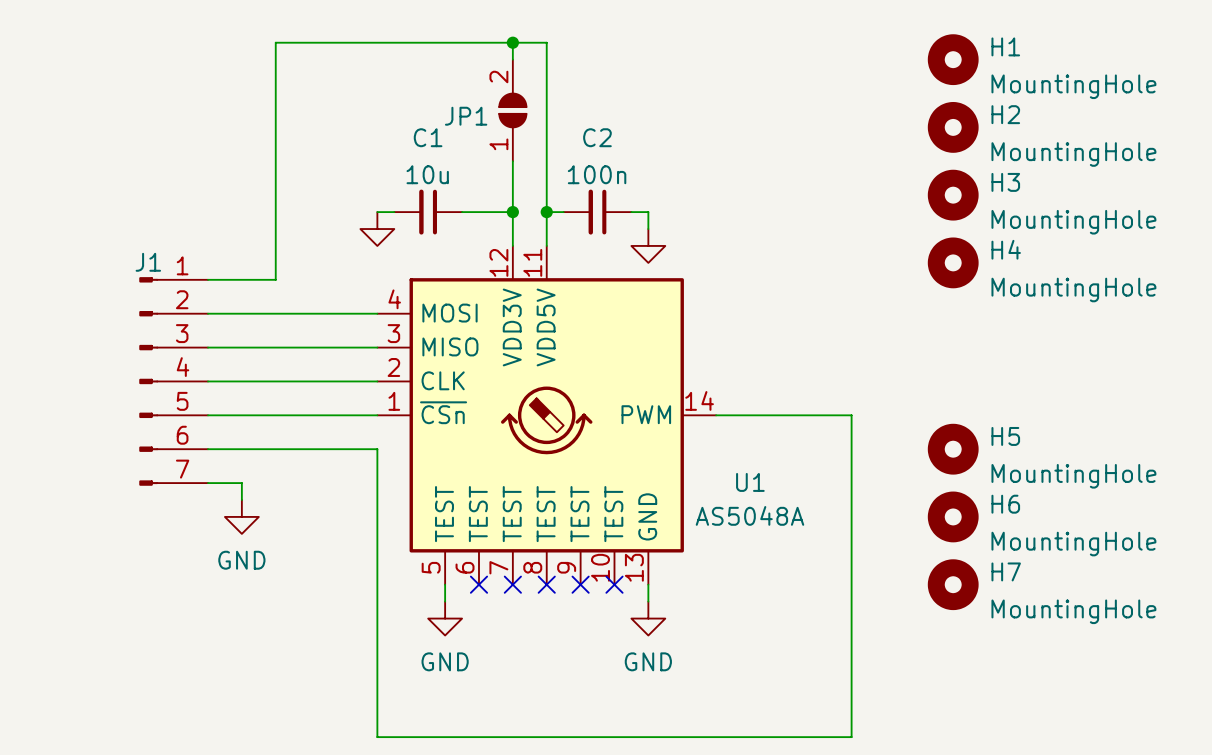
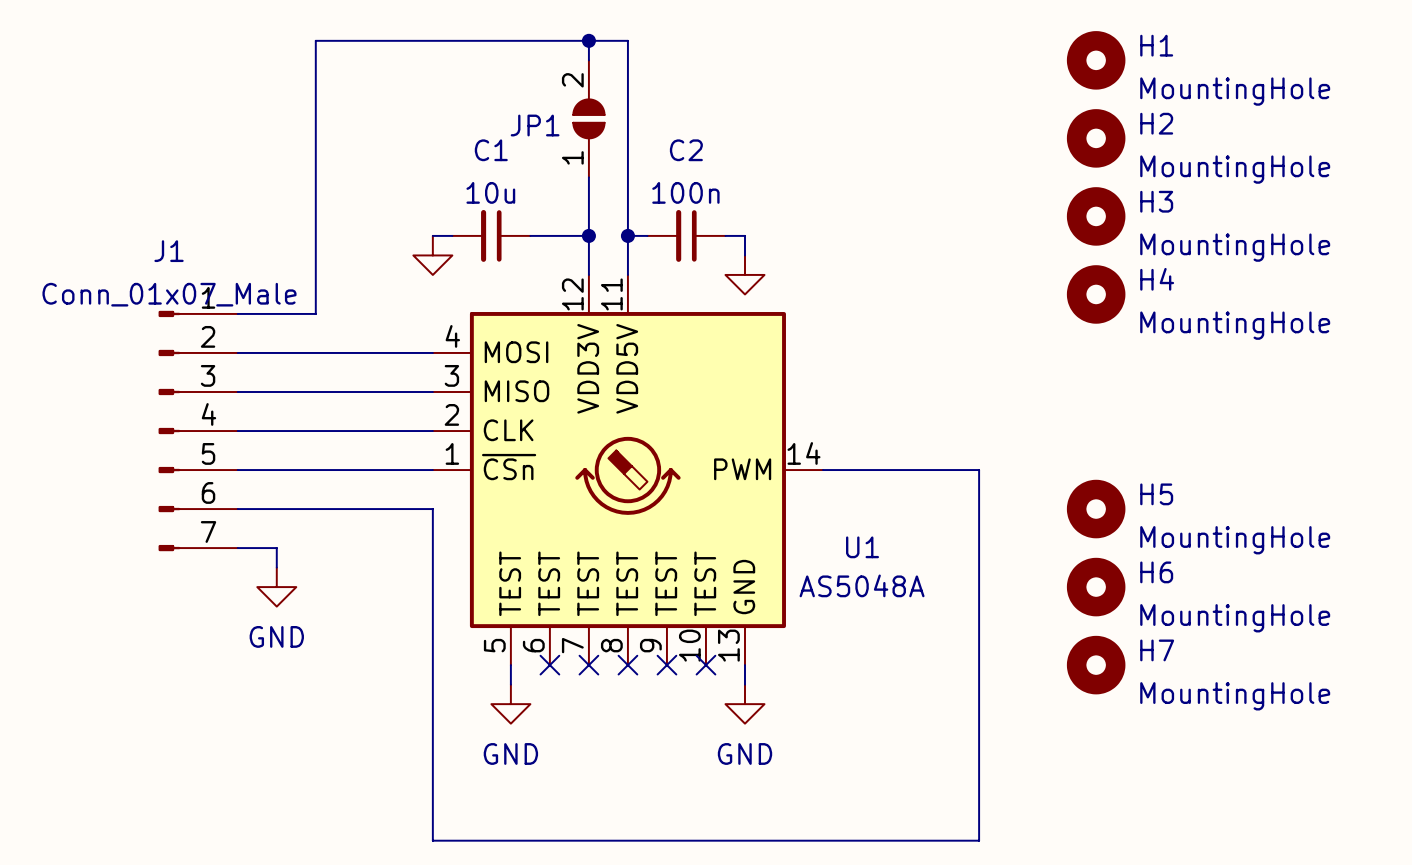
J1 name position: J1 (148, 262) -> J1 (169, 251)
J1 value: none -> Conn_01x07_Male (169, 294)

